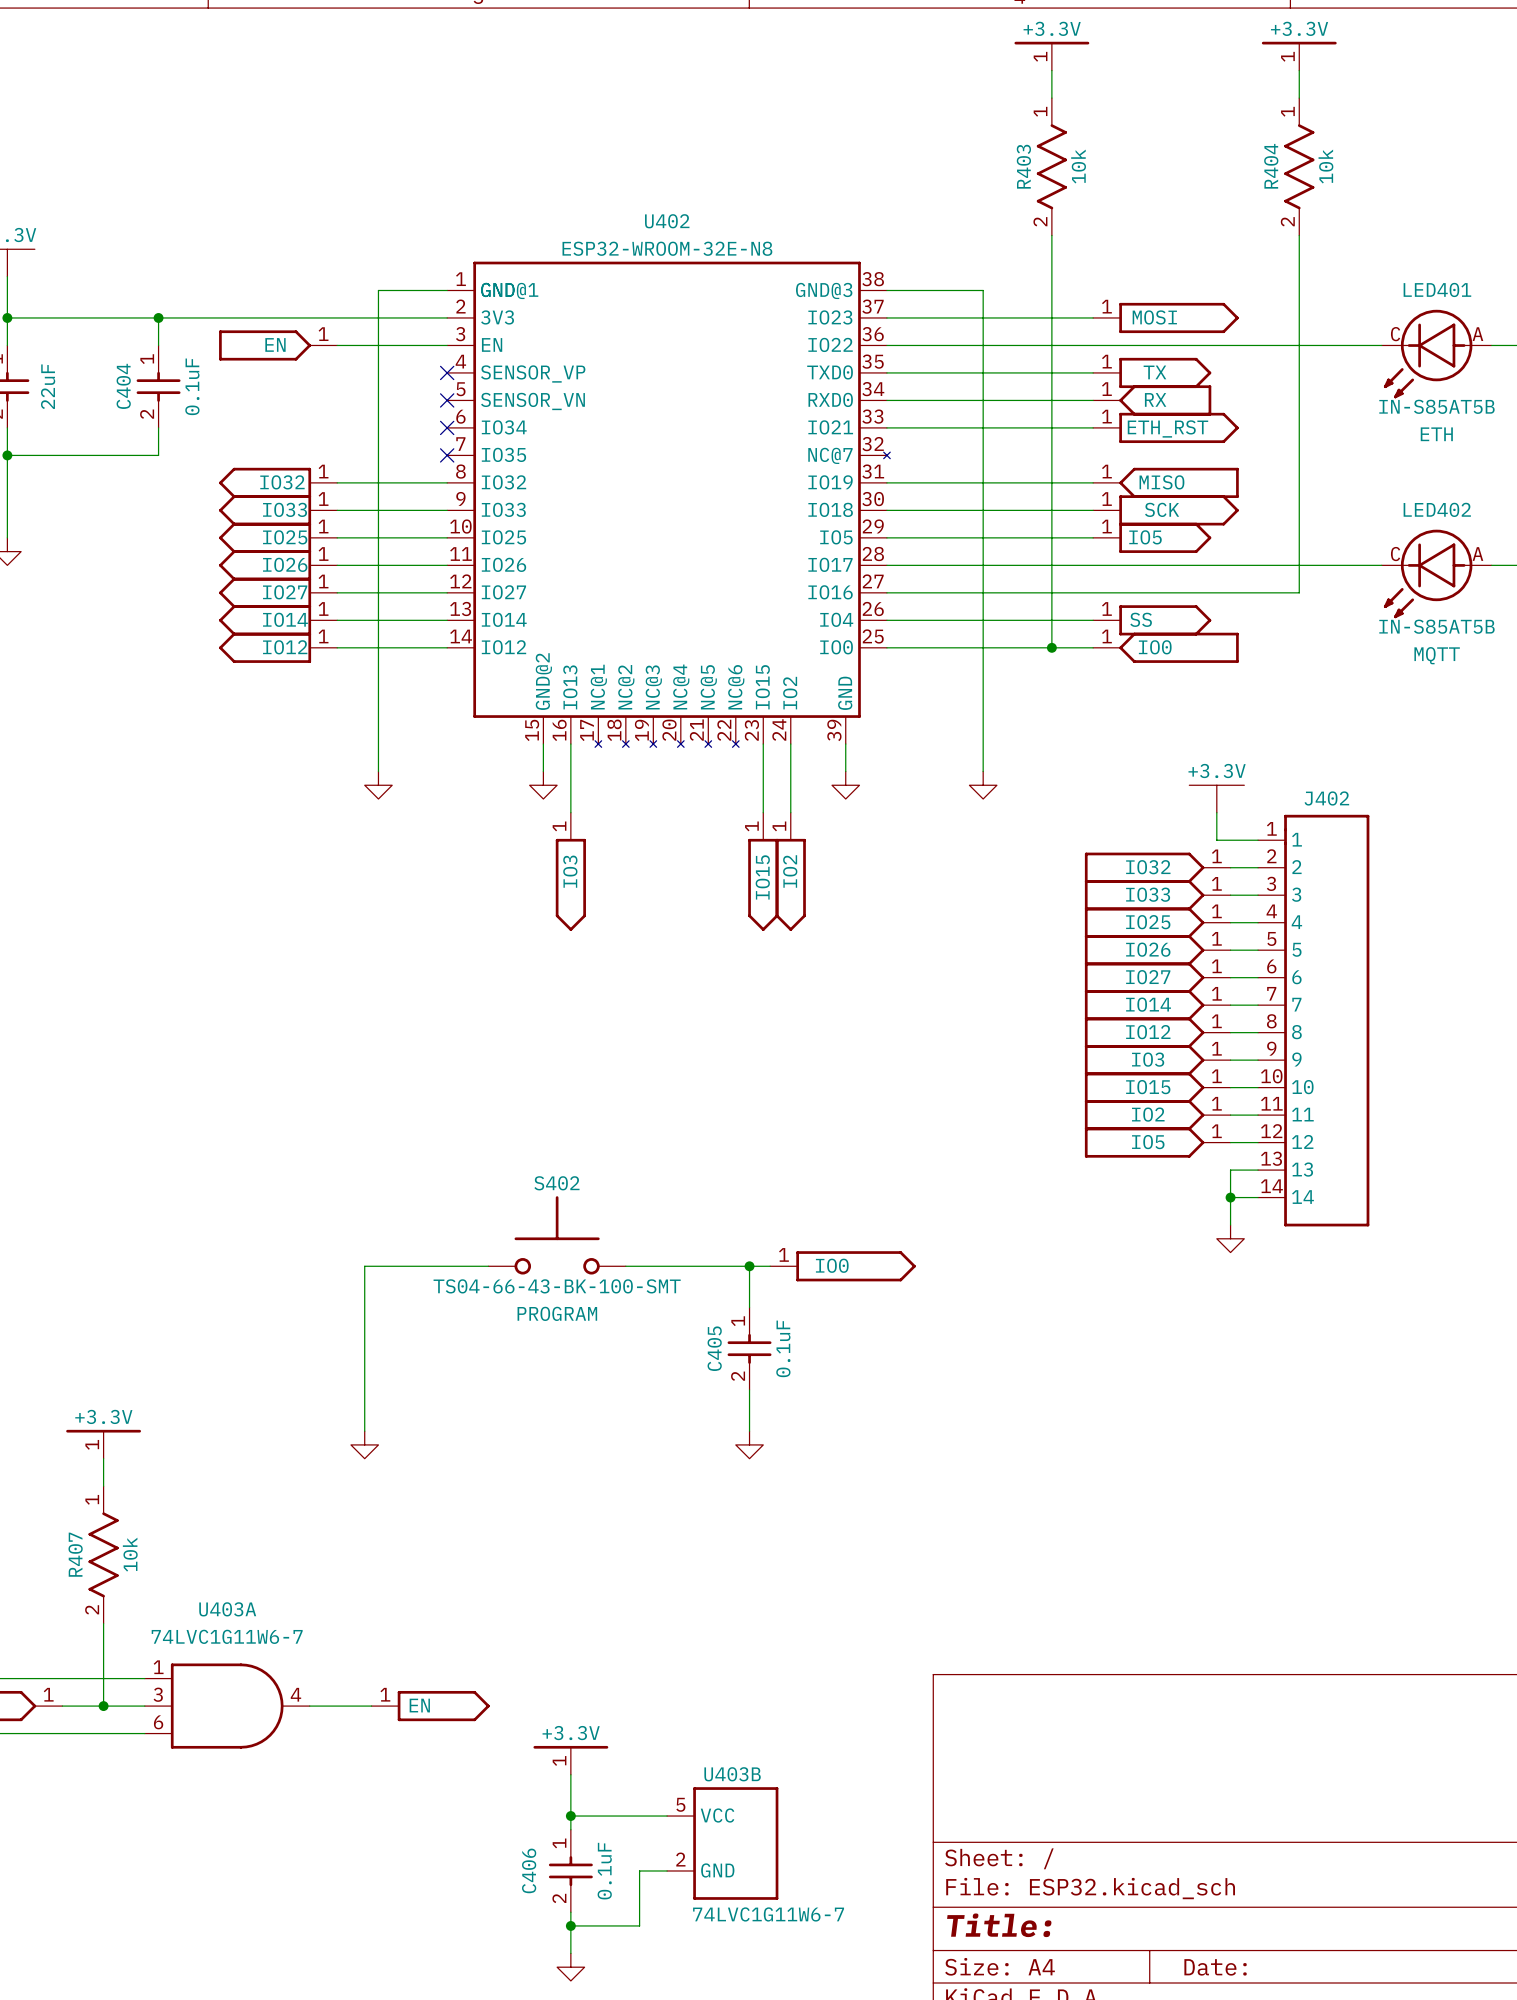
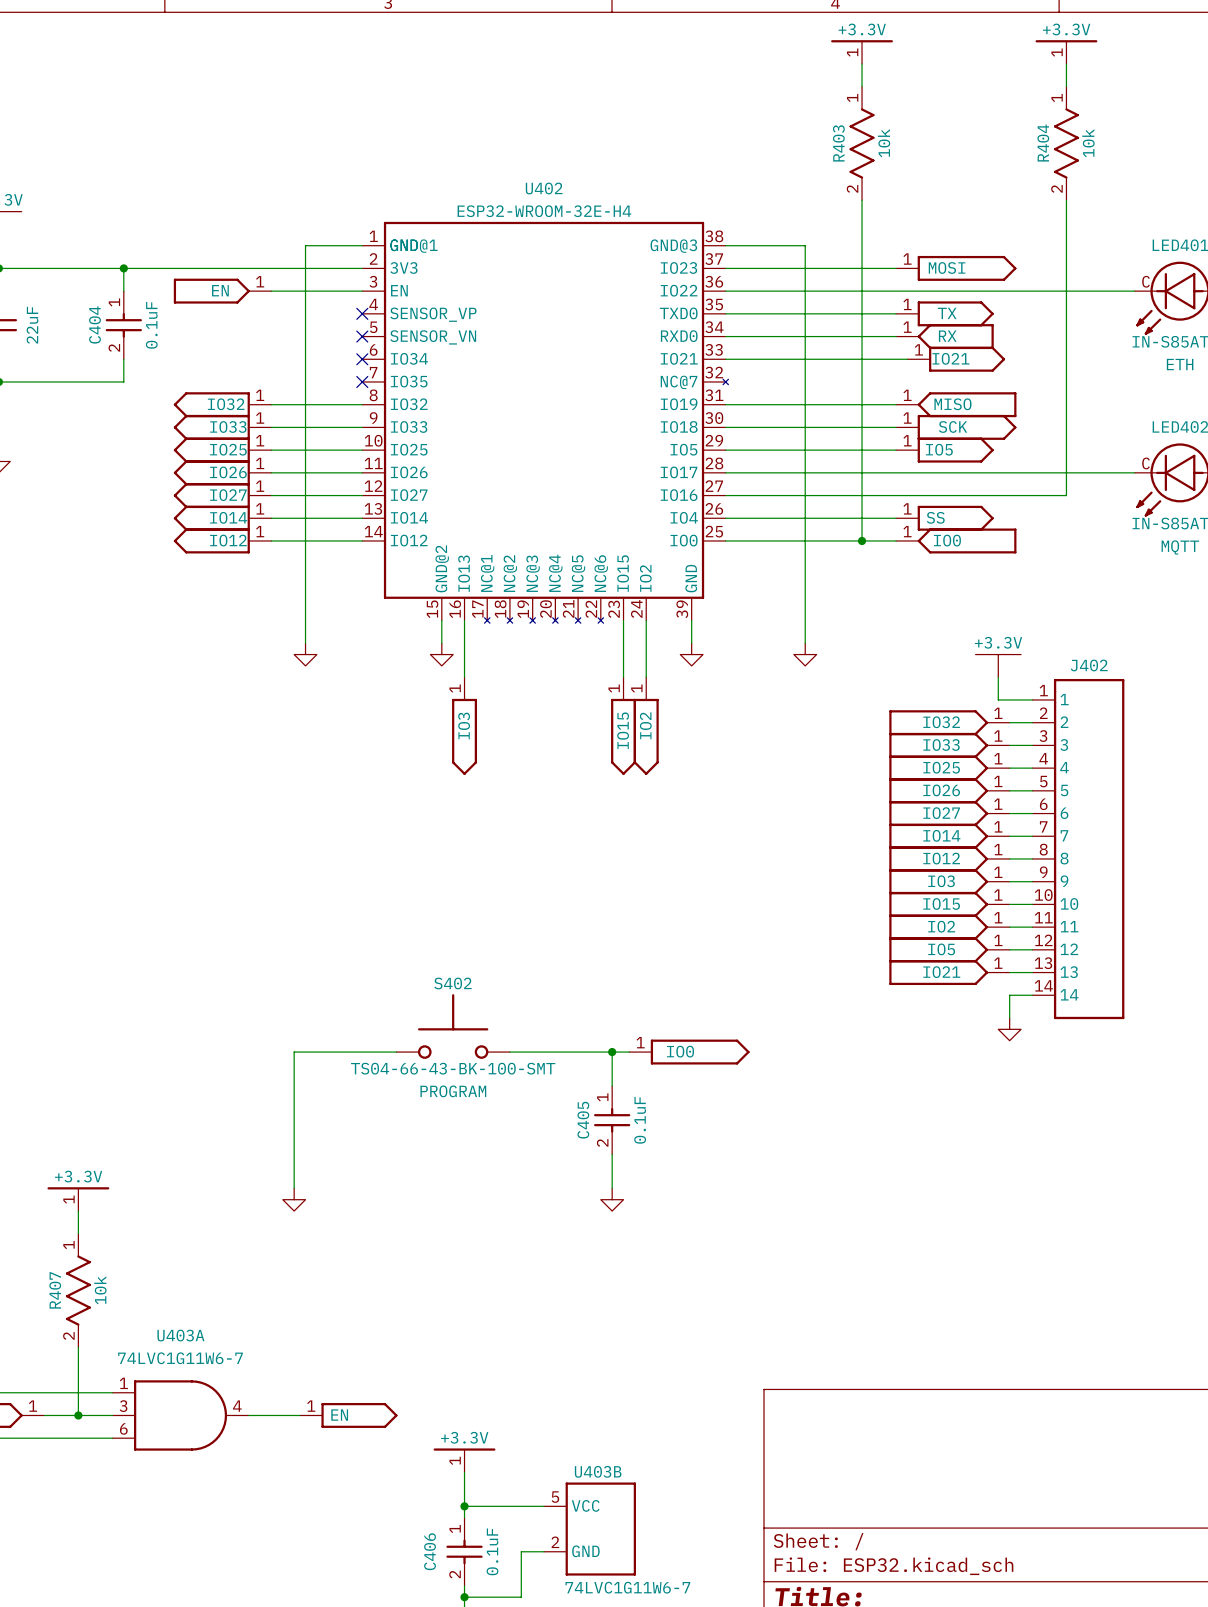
U402 text: ESP32-WROOM-32E-N8 (667, 248) -> ESP32-WROOM-32E-H4 (544, 211)
power symbol: ETH_RST (1165, 427) -> IO21 (956, 359)
power symbol: none -> IO21 (949, 972)
wire: (1230, 1170) (1230, 1197) -> none
junction: (1230, 1197) -> none

